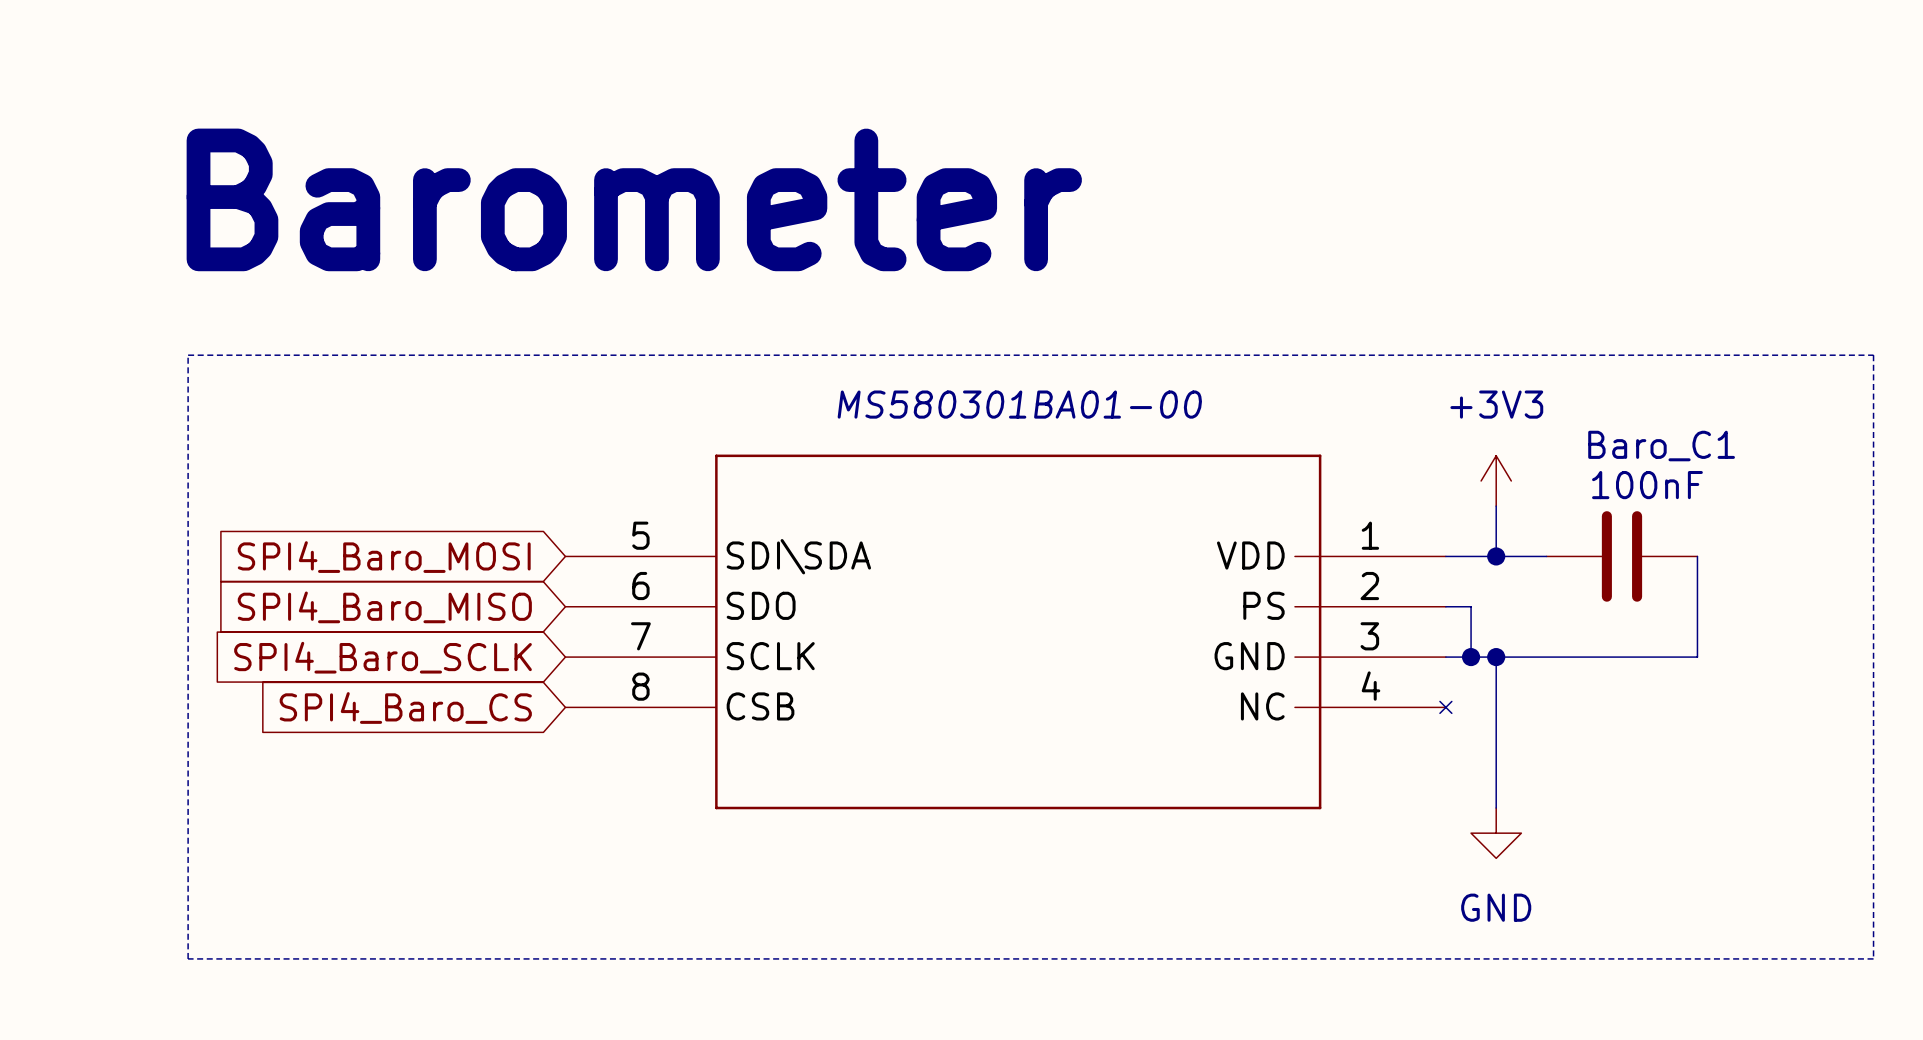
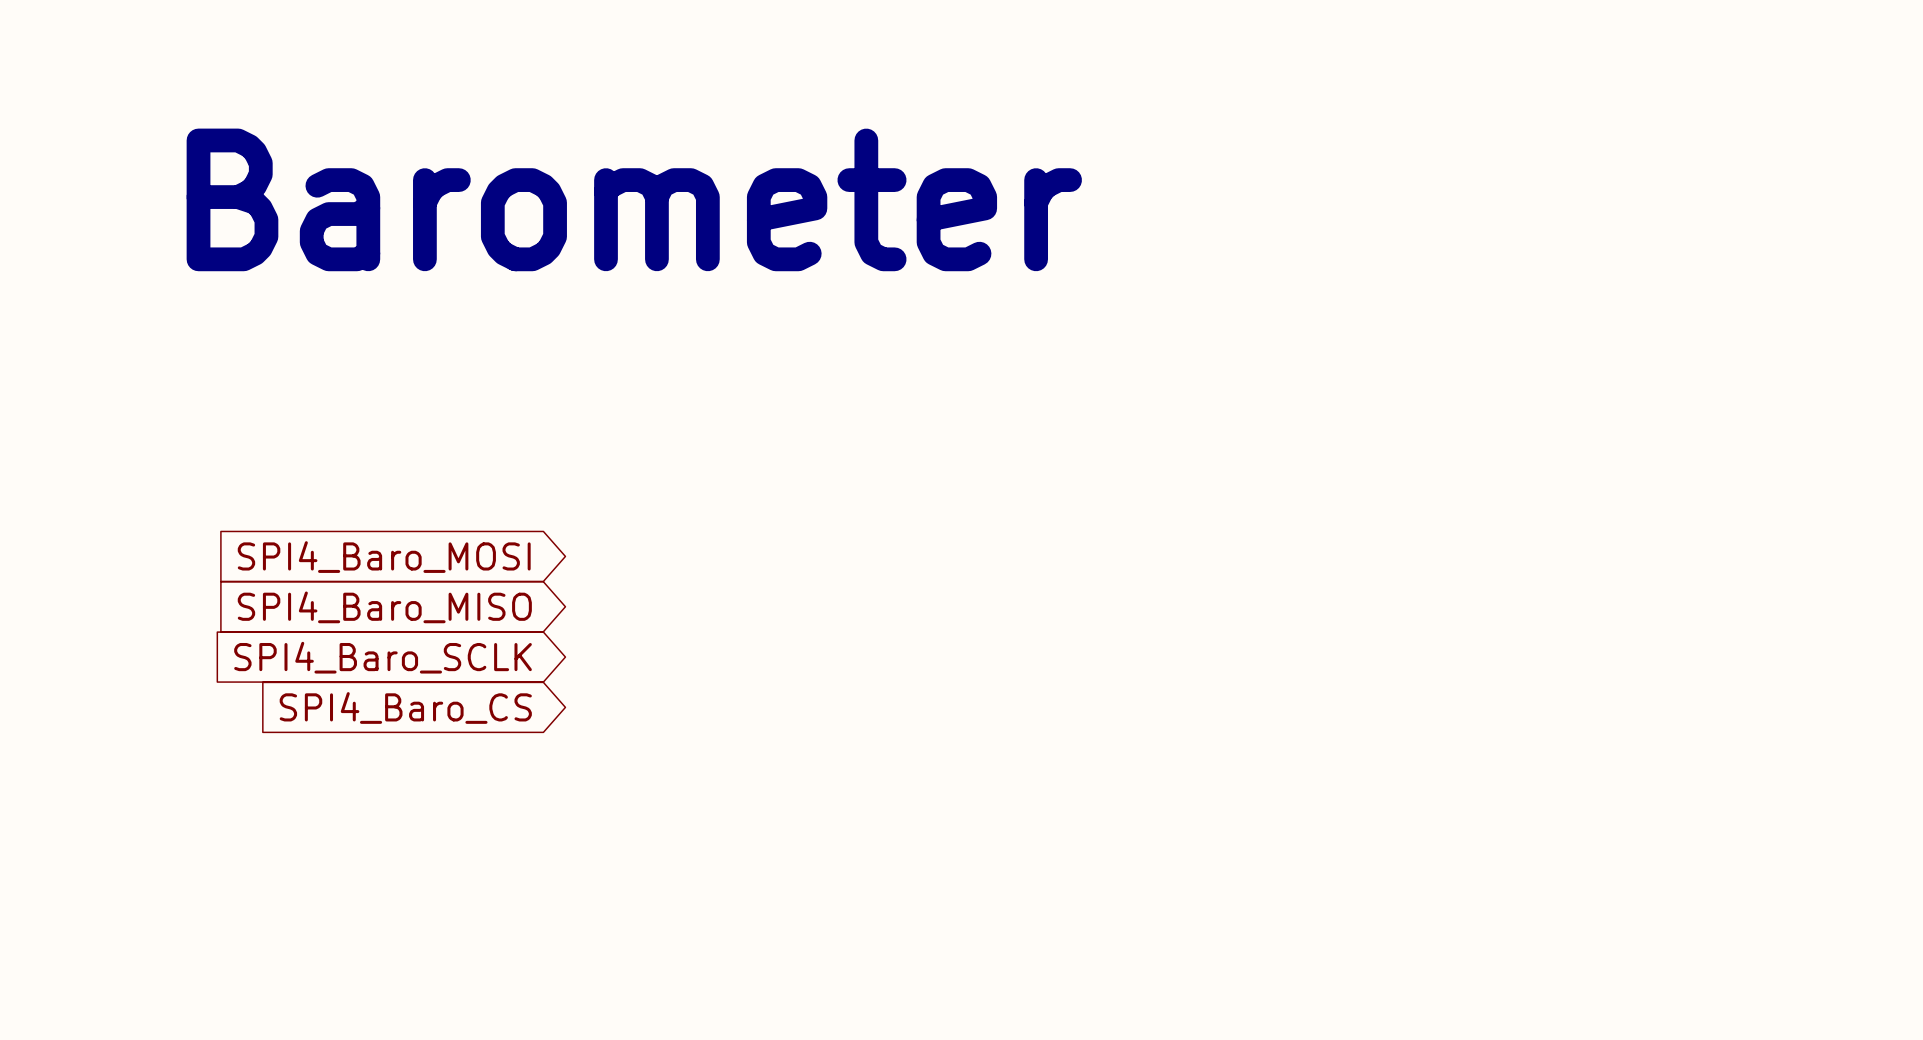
line: (188, 355) (1873, 355) (1873, 958) (188, 958) (188, 355) -> none
power symbol: +3V3 (1496, 480) -> none
wire: (1496, 506) (1496, 556) -> none
wire: (1445, 556) (1546, 556) -> none
junction: (1496, 556) -> none
Baro_C1: 100nF (1621, 556) -> none
wire: (1697, 556) (1697, 657) (1445, 657) -> none
wire: (1445, 606) (1471, 606) (1471, 657) -> none
part: (1008, 631) -> none
junction: (1471, 657) -> none
wire: (1496, 657) (1496, 808) -> none
junction: (1496, 657) -> none
power symbol: GND (1496, 833) -> none

